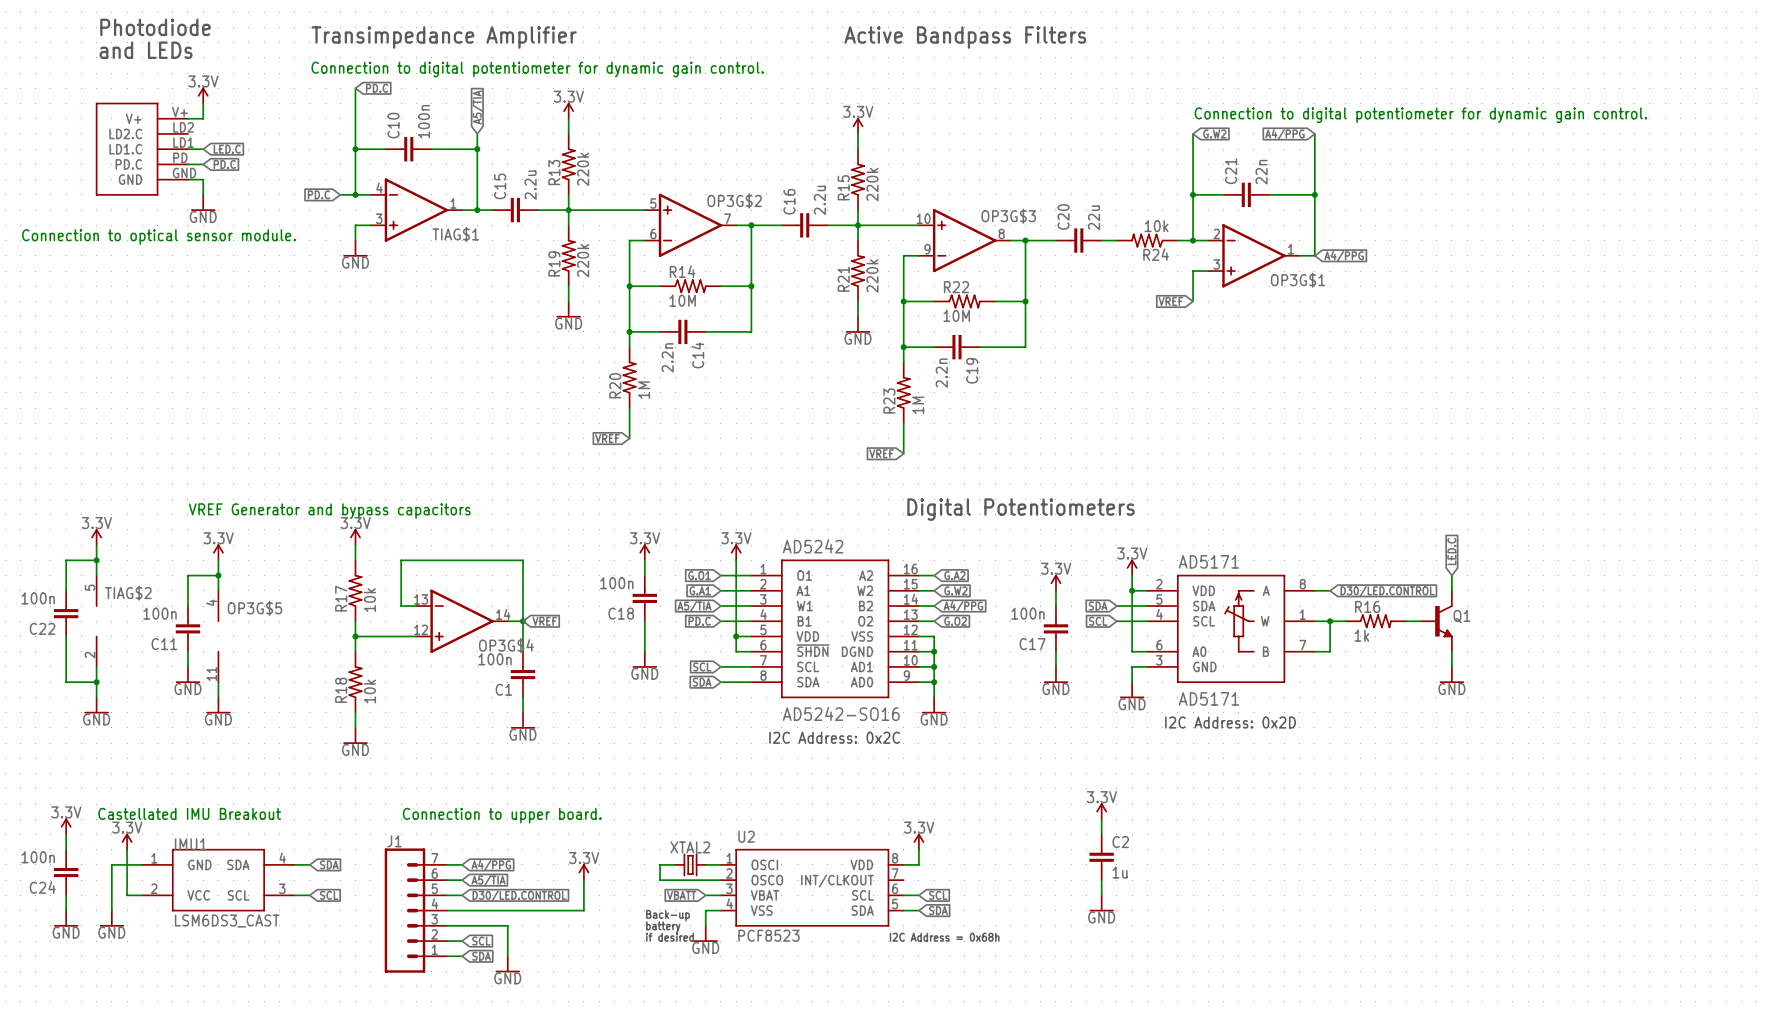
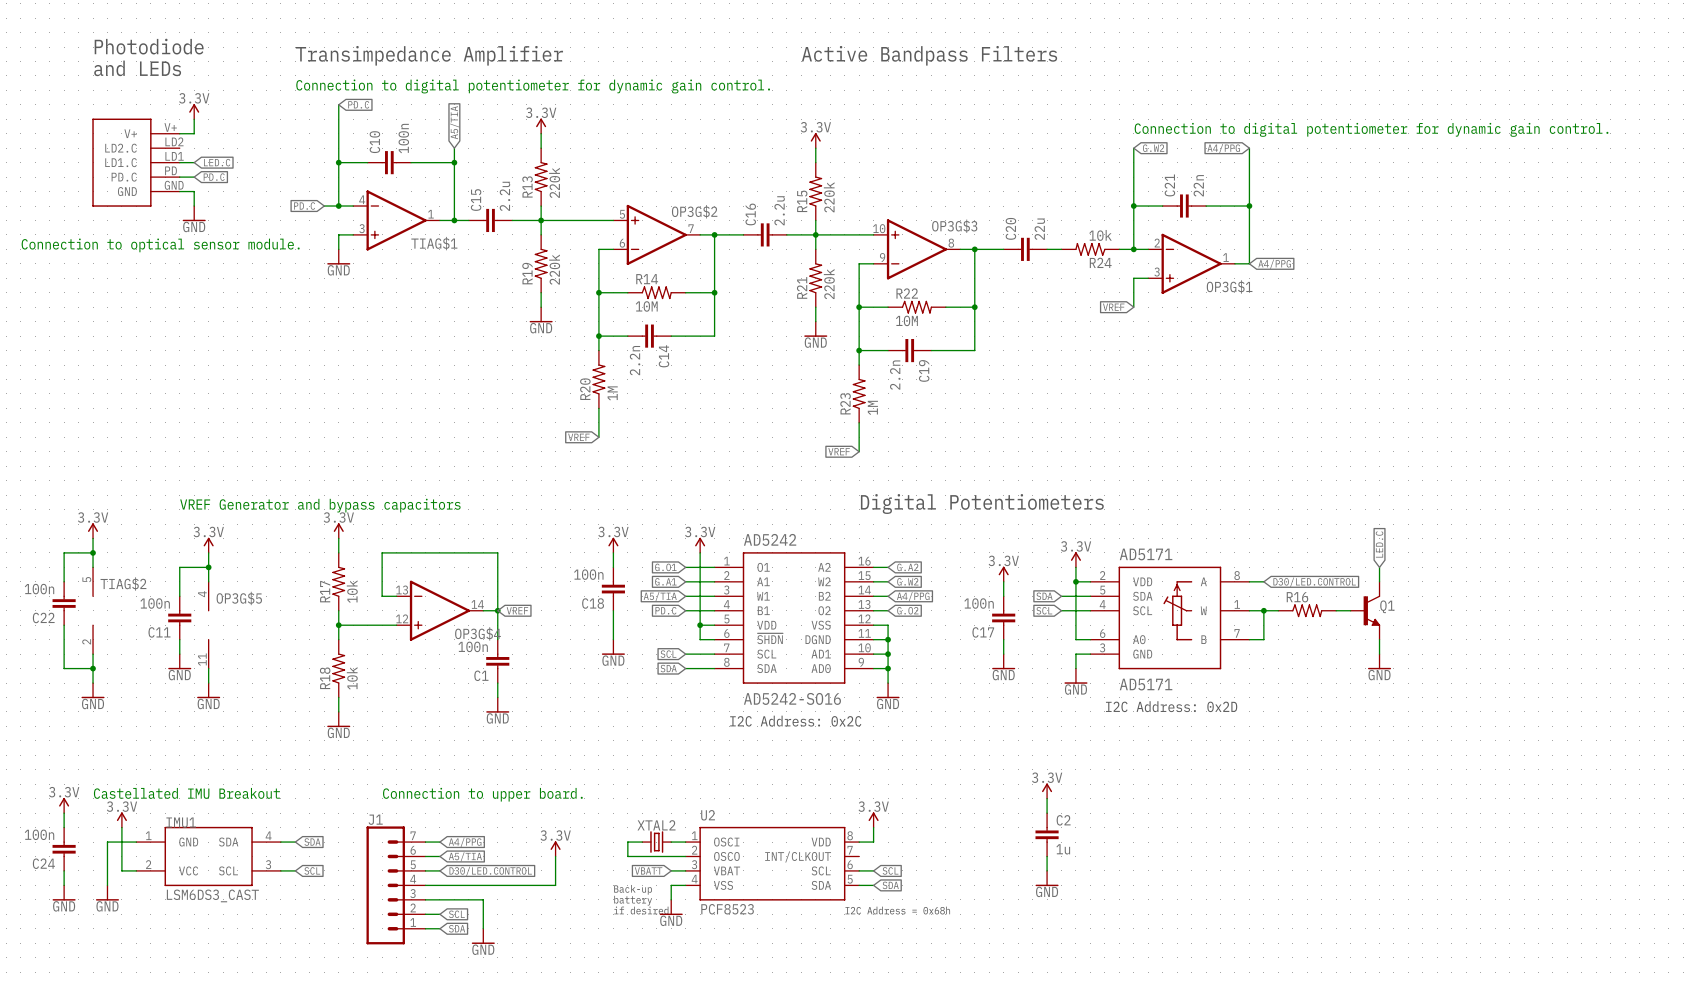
R16 value: 1k (1361, 635) -> none

